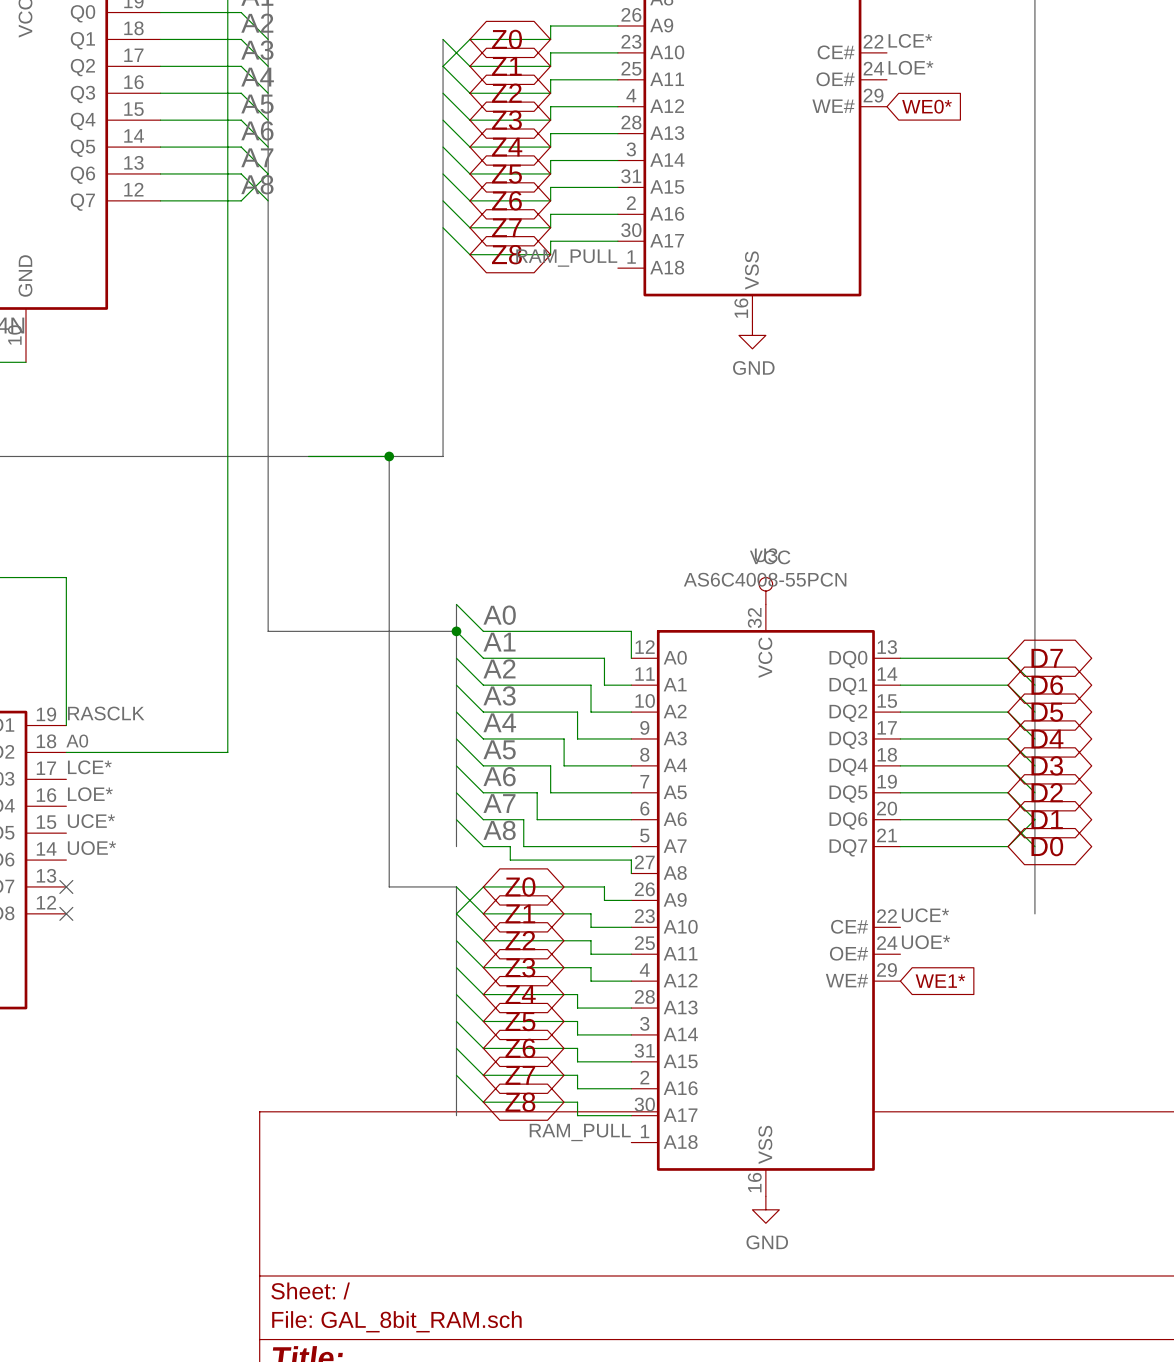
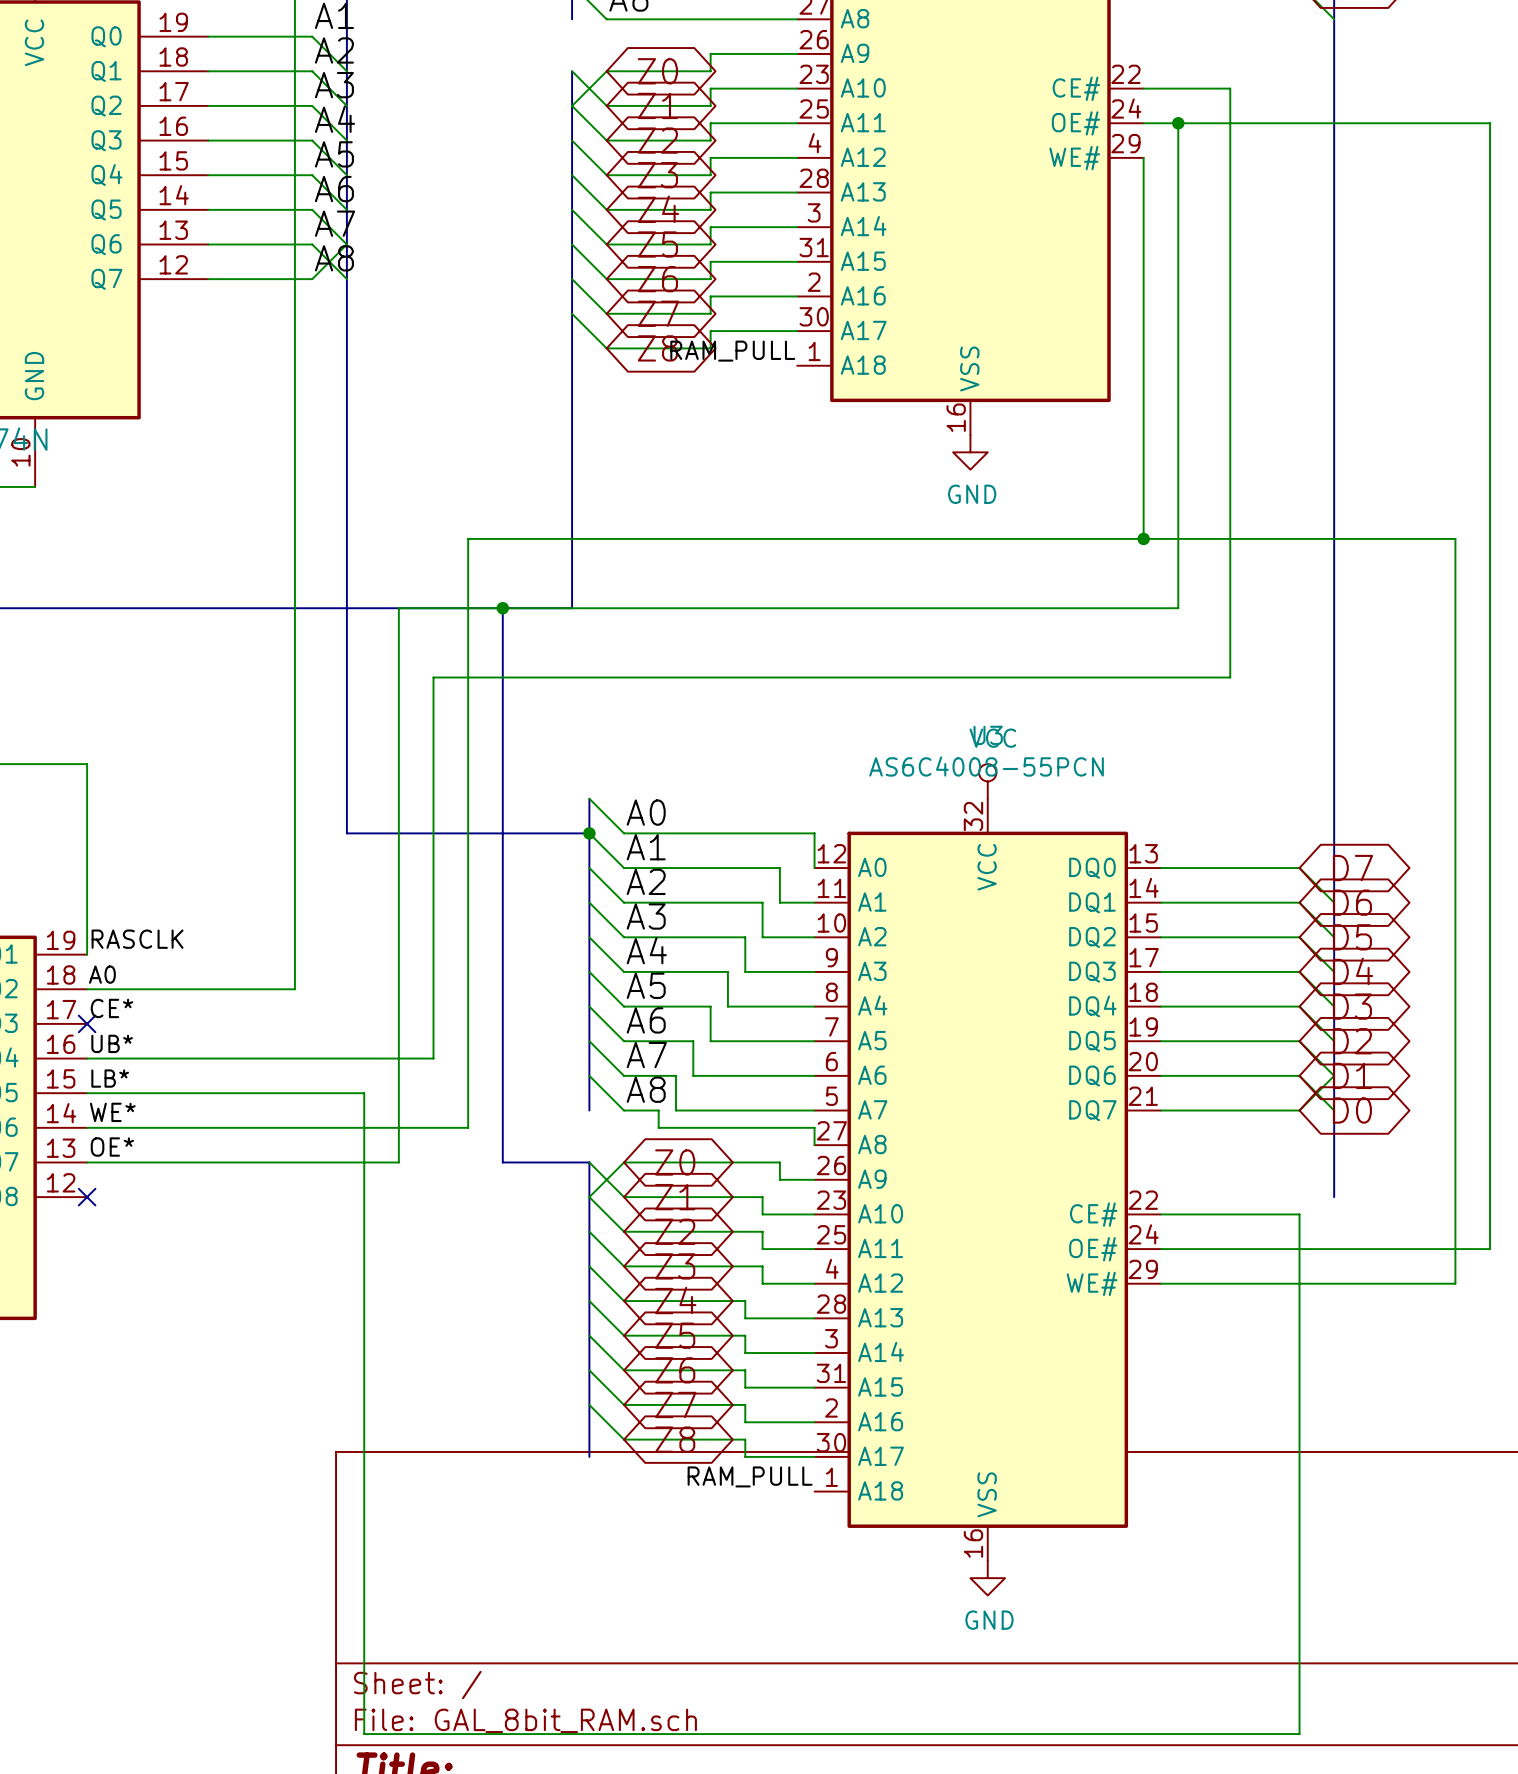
label: LCE* (910, 40) -> none
wire: none -> (1143, 88) (1230, 88) (1230, 677) (433, 677) (433, 1058) (87, 1058)
label: LOE* (910, 67) -> none
wire: none -> (1143, 123) (1490, 123) (1490, 1249) (1160, 1249)
wire: none -> (1178, 123) (1178, 608) (502, 608)
junction: none -> (1178, 123)
wire: none -> (1143, 157) (1143, 538)
global label: WE0* (926, 106) -> none
junction: none -> (1143, 538)
wire: none -> (398, 608) (398, 1162) (87, 1162)
label: LCE* (89, 767) -> CE* (111, 1008)
no-connect mark: none -> (87, 1023)
label: LOE* (90, 794) -> UB* (112, 1043)
label: UCE* (91, 821) -> LB* (110, 1078)
wire: none -> (87, 1093) (364, 1093) (364, 1734) (1299, 1734) (1299, 1214) (1160, 1214)
label: UOE* (91, 848) -> WE* (112, 1112)
wire: none -> (87, 1127) (468, 1127) (468, 538) (1455, 538) (1455, 1283) (1160, 1283)
label: none -> OE* (112, 1147)
no-connect mark: (66, 886) -> none
label: UCE* (925, 915) -> none
label: UOE* (926, 942) -> none
global label: WE1* (940, 981) -> none

